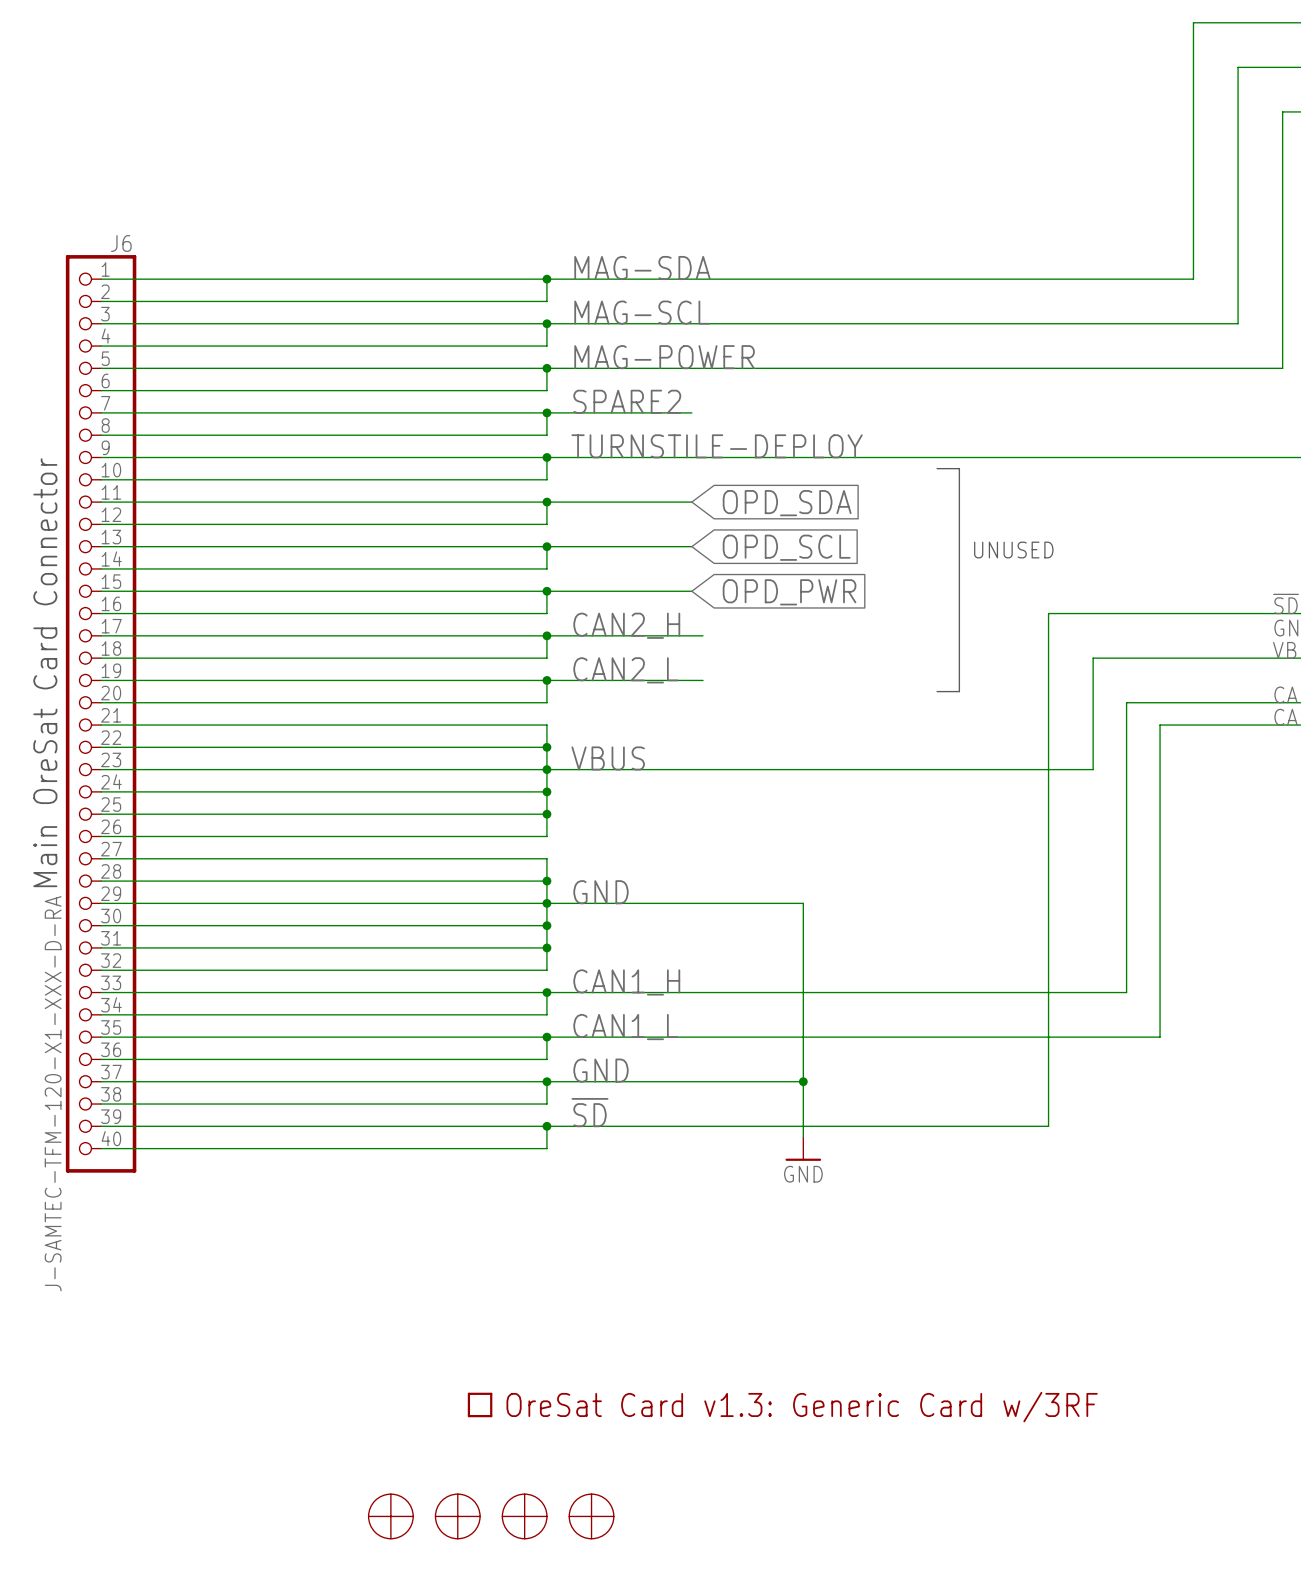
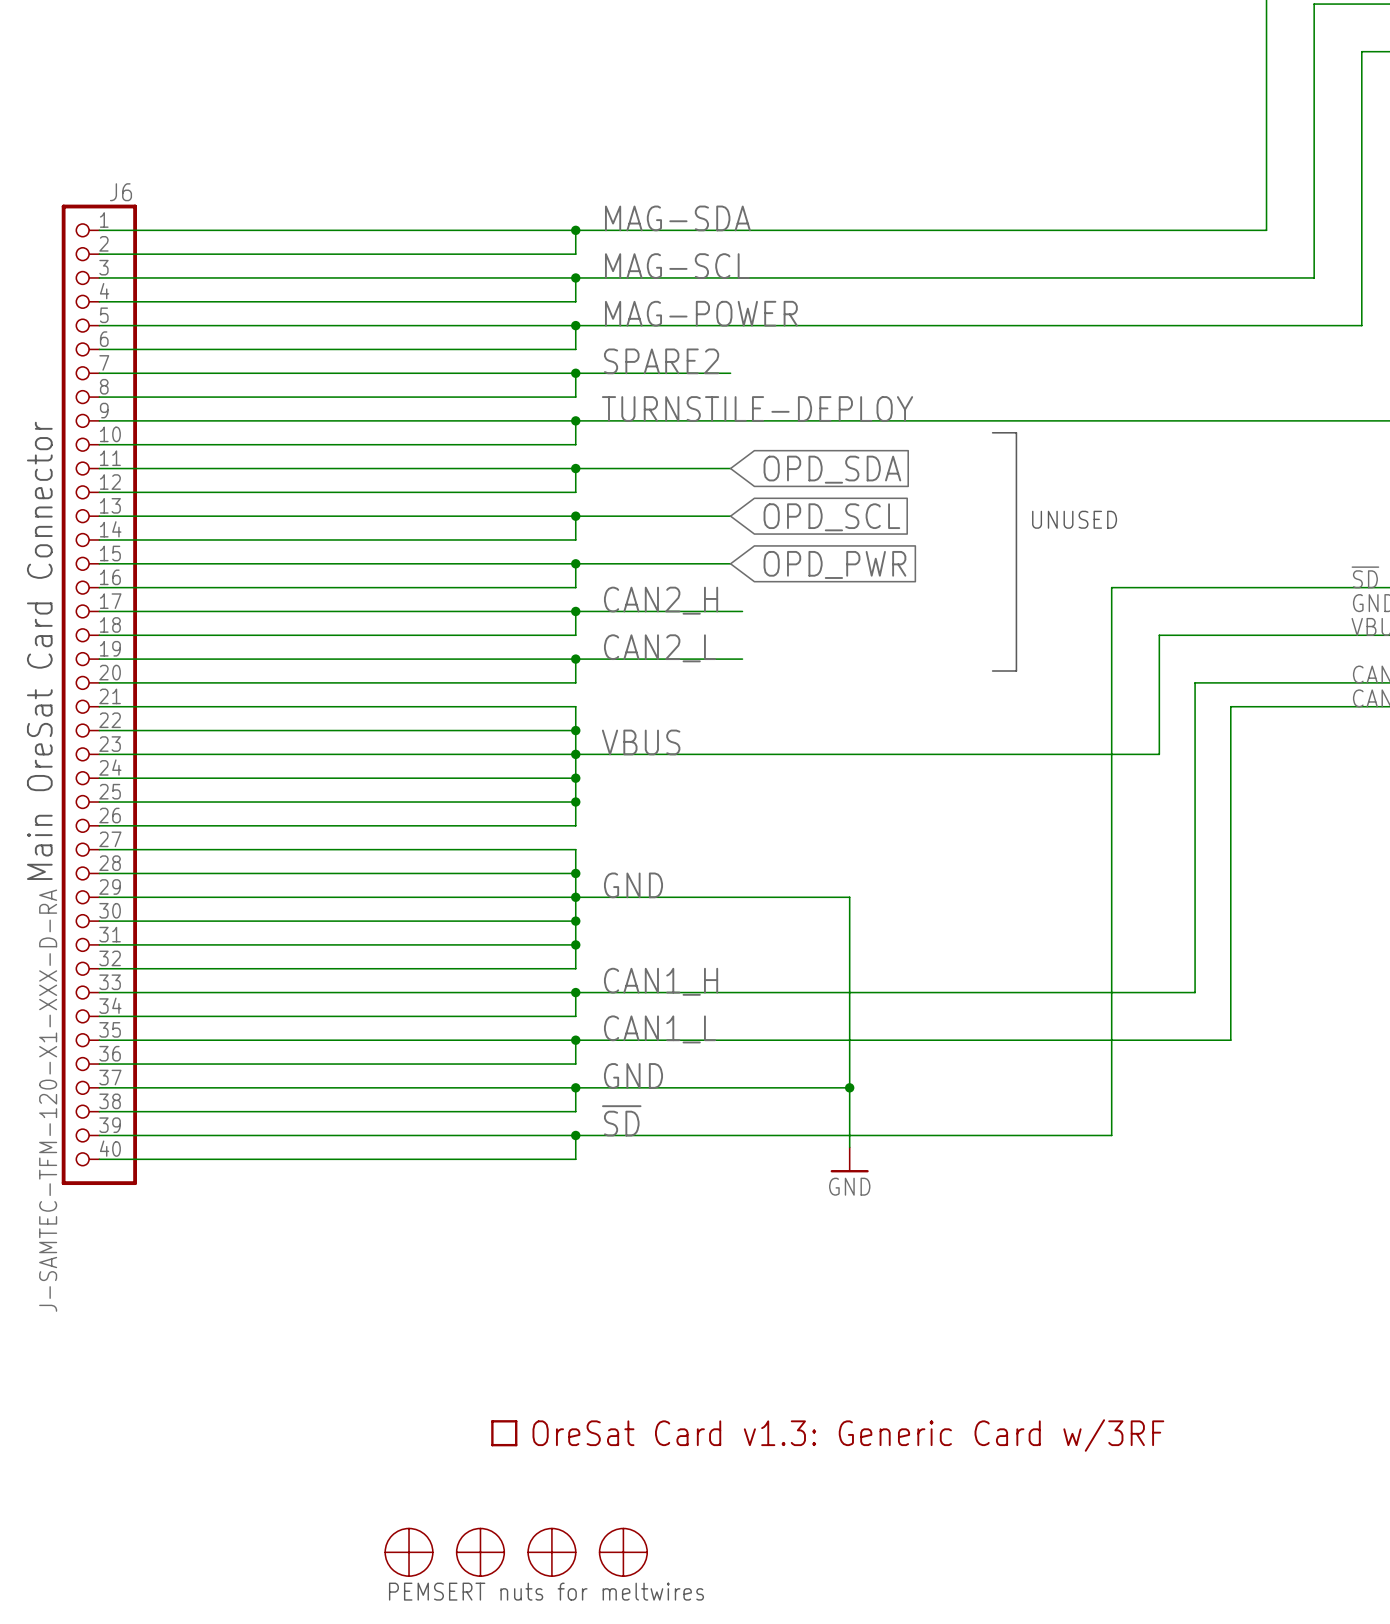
text: none -> PEMSERT nuts for meltwires (546, 1591)

